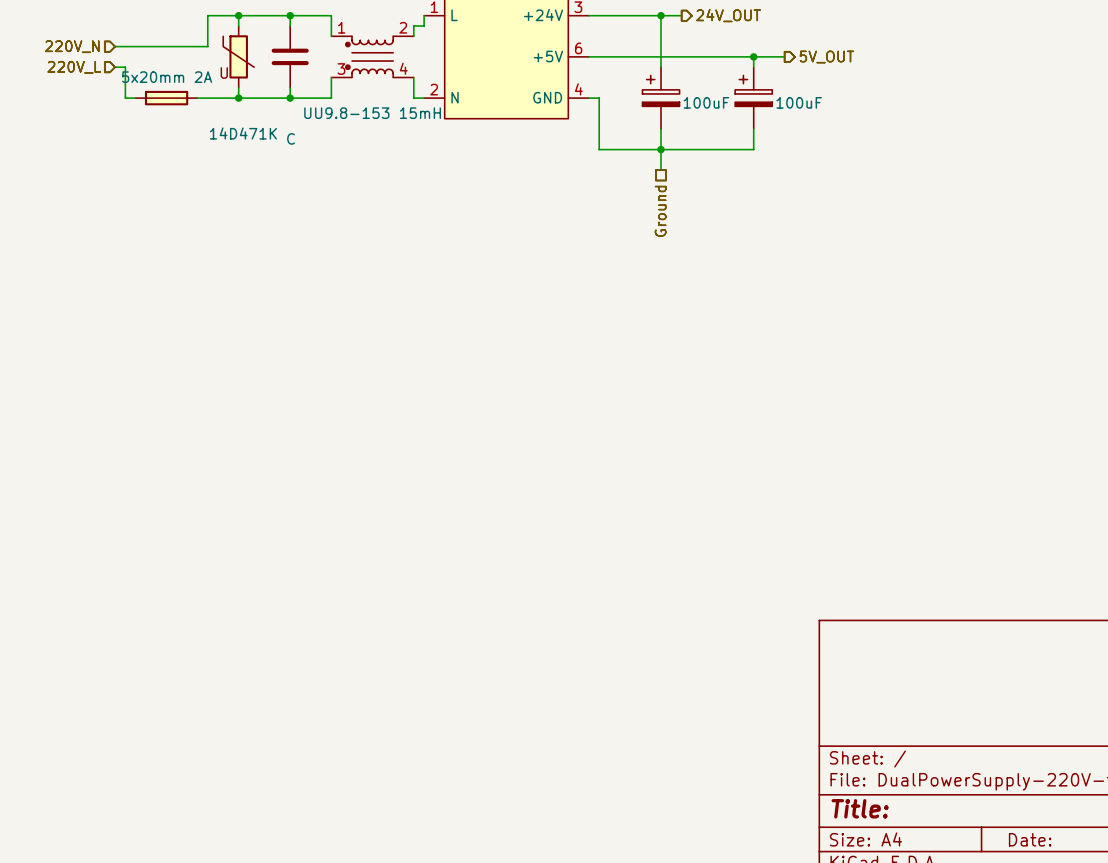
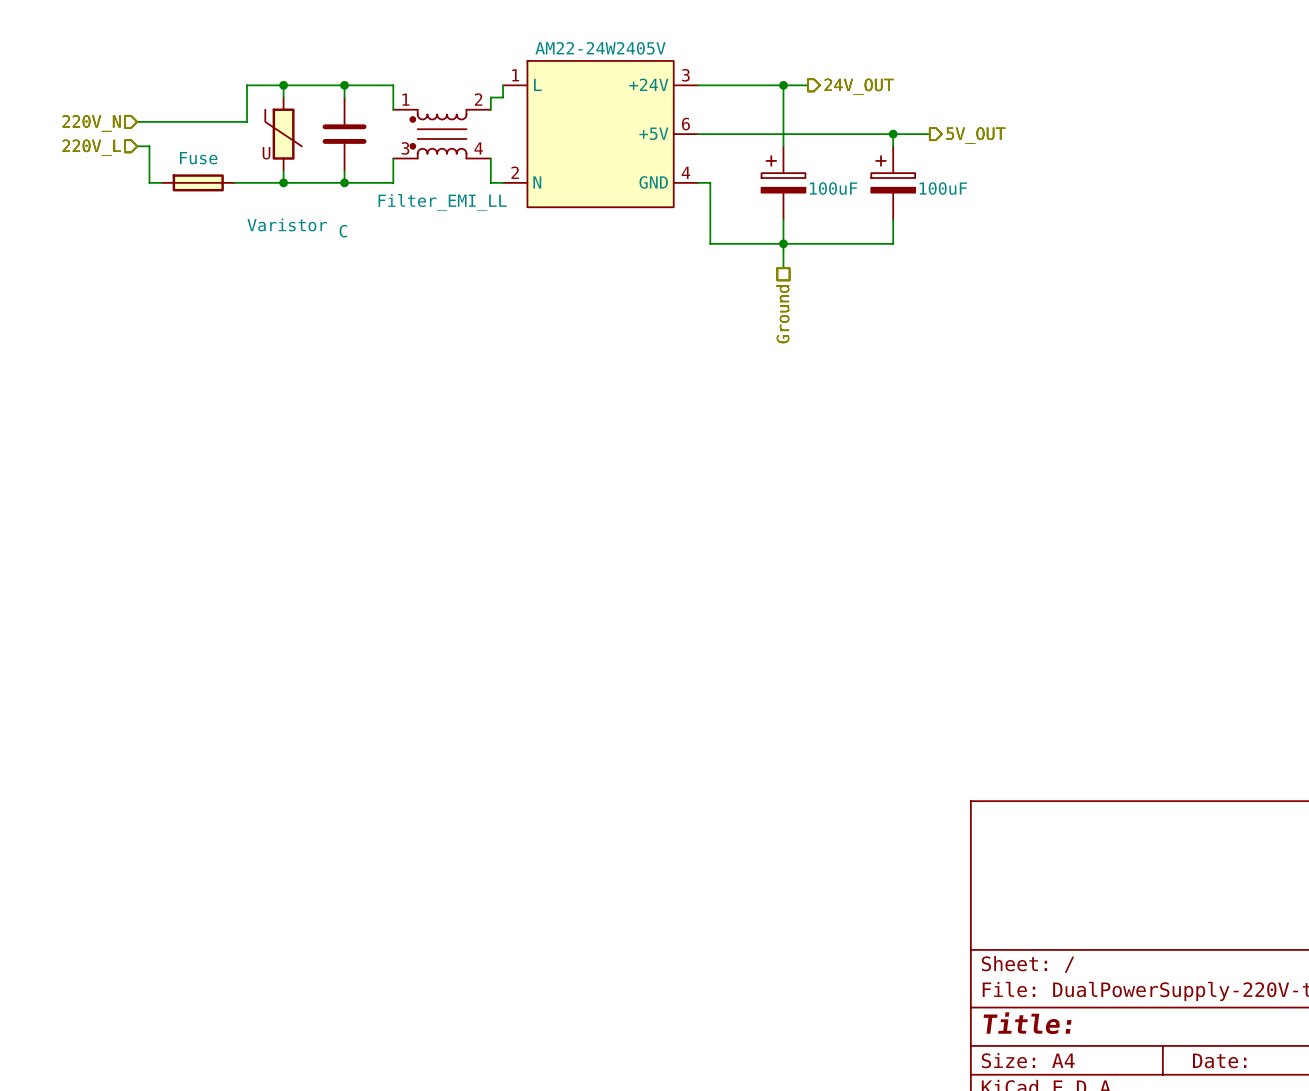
part value: 5x20mm 2A (167, 77) -> Fuse (198, 158)
part value: UU9.8-153 15mH (372, 113) -> Filter_EMI_LL (442, 202)
part value: 14D471K (243, 133) -> Varistor (287, 224)

